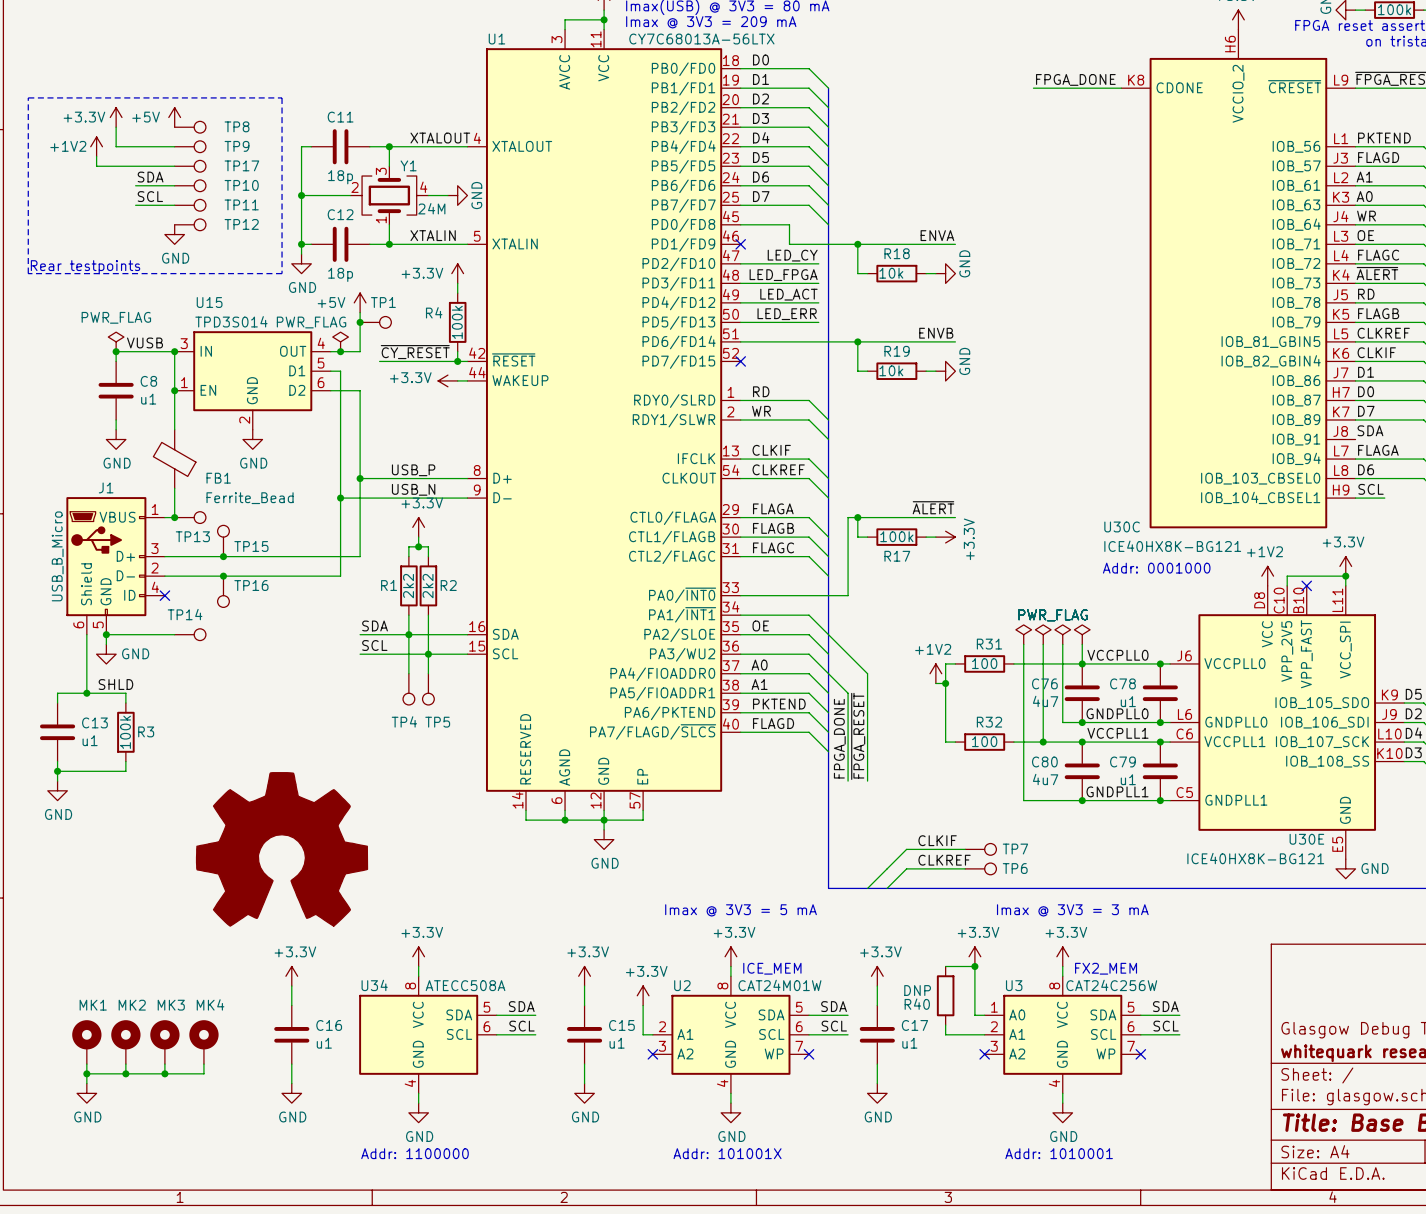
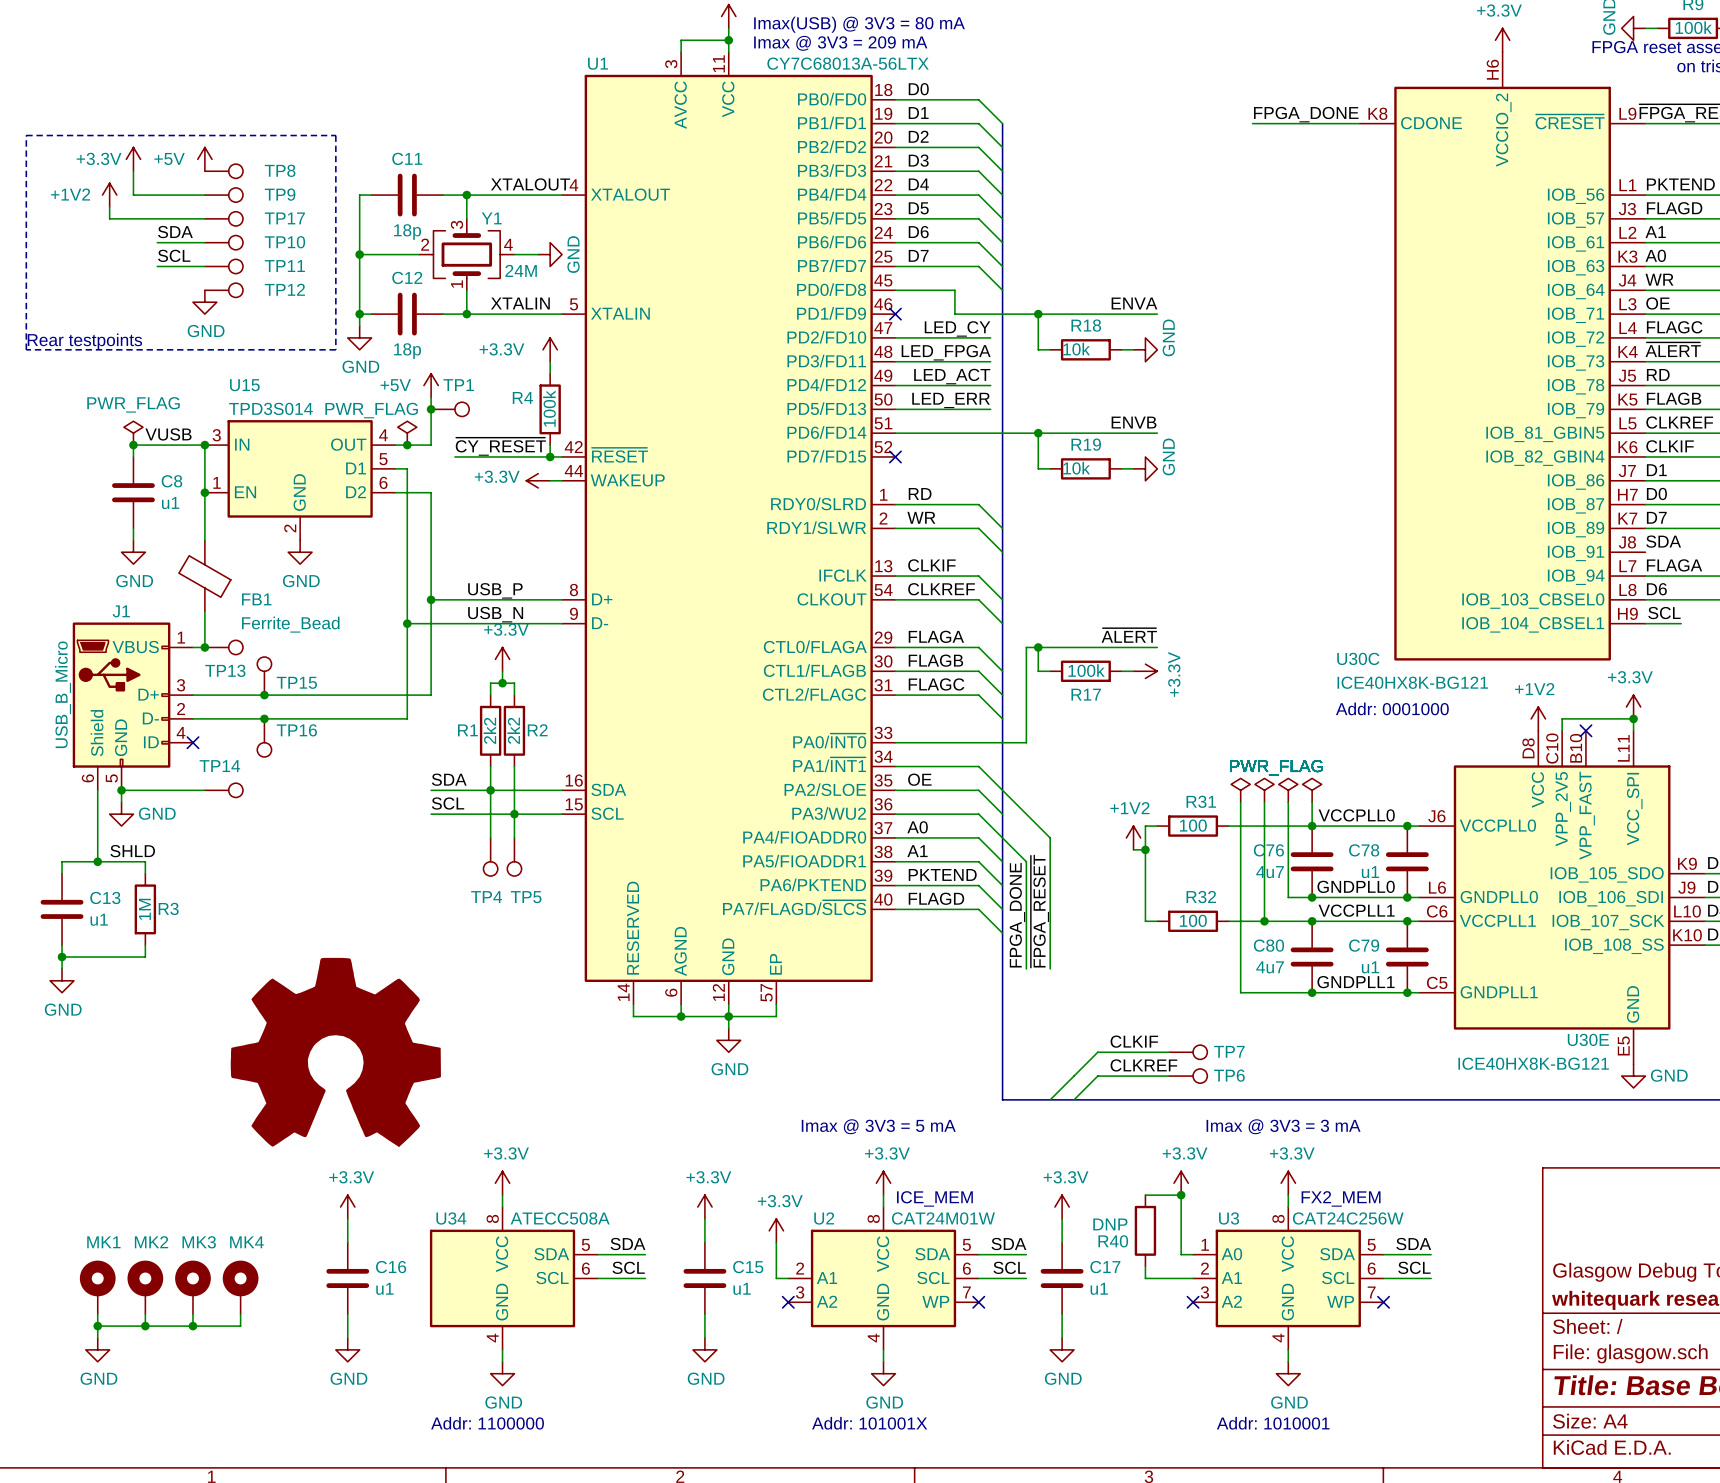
R3 value: 100k (125, 732) -> 1M (144, 909)

